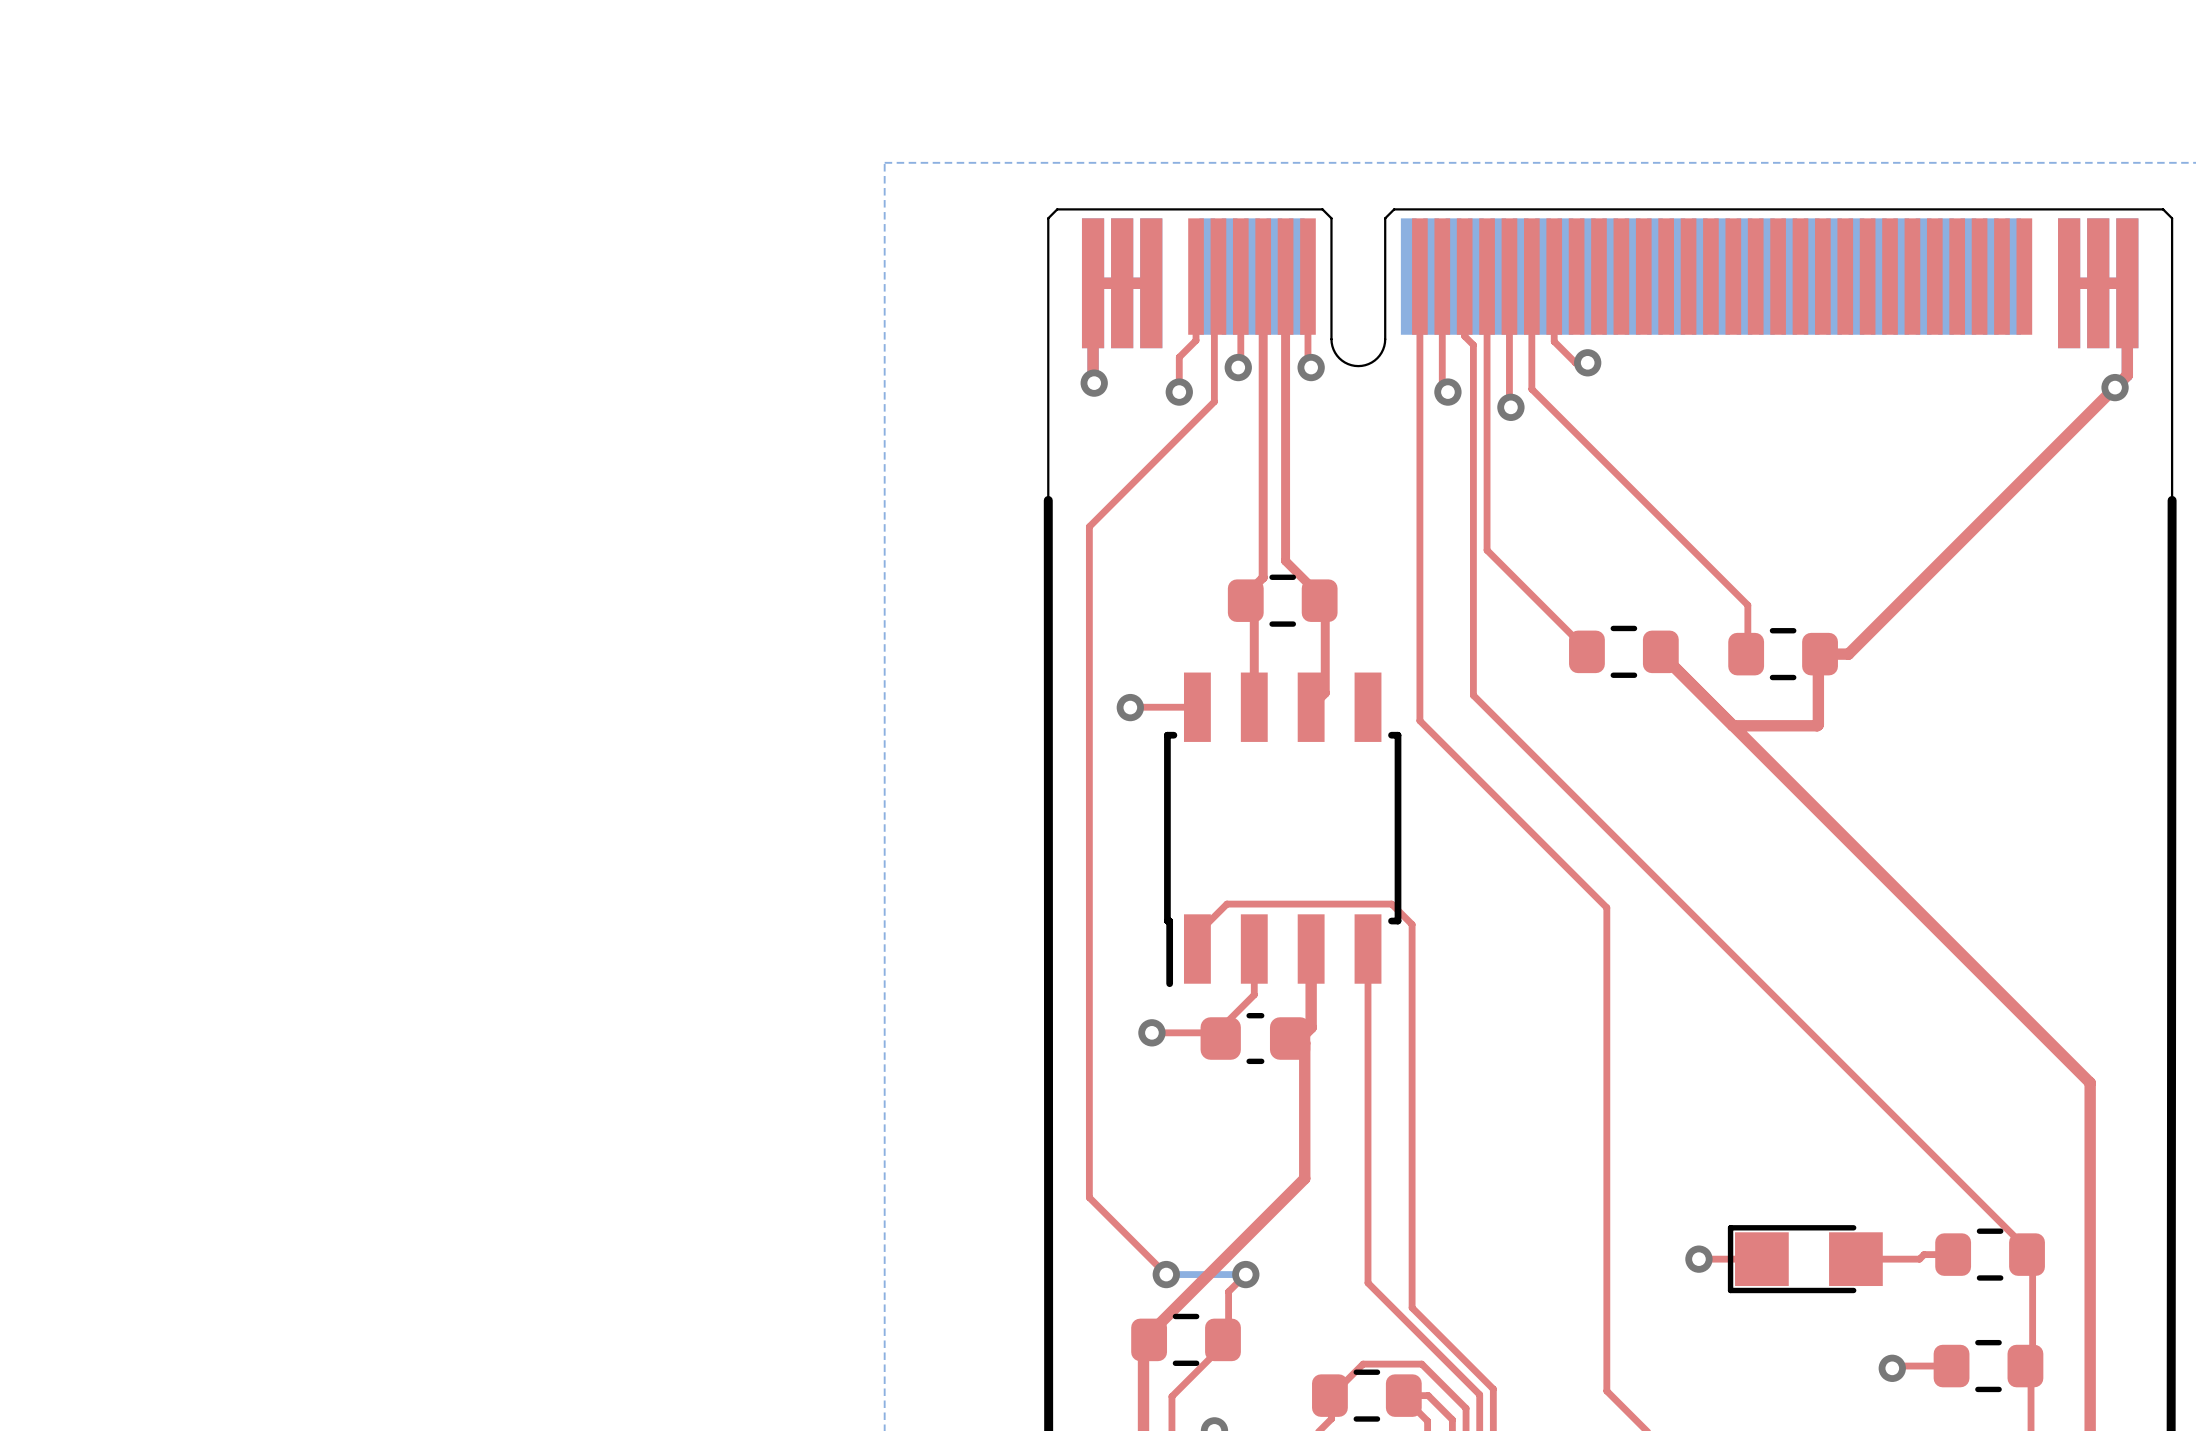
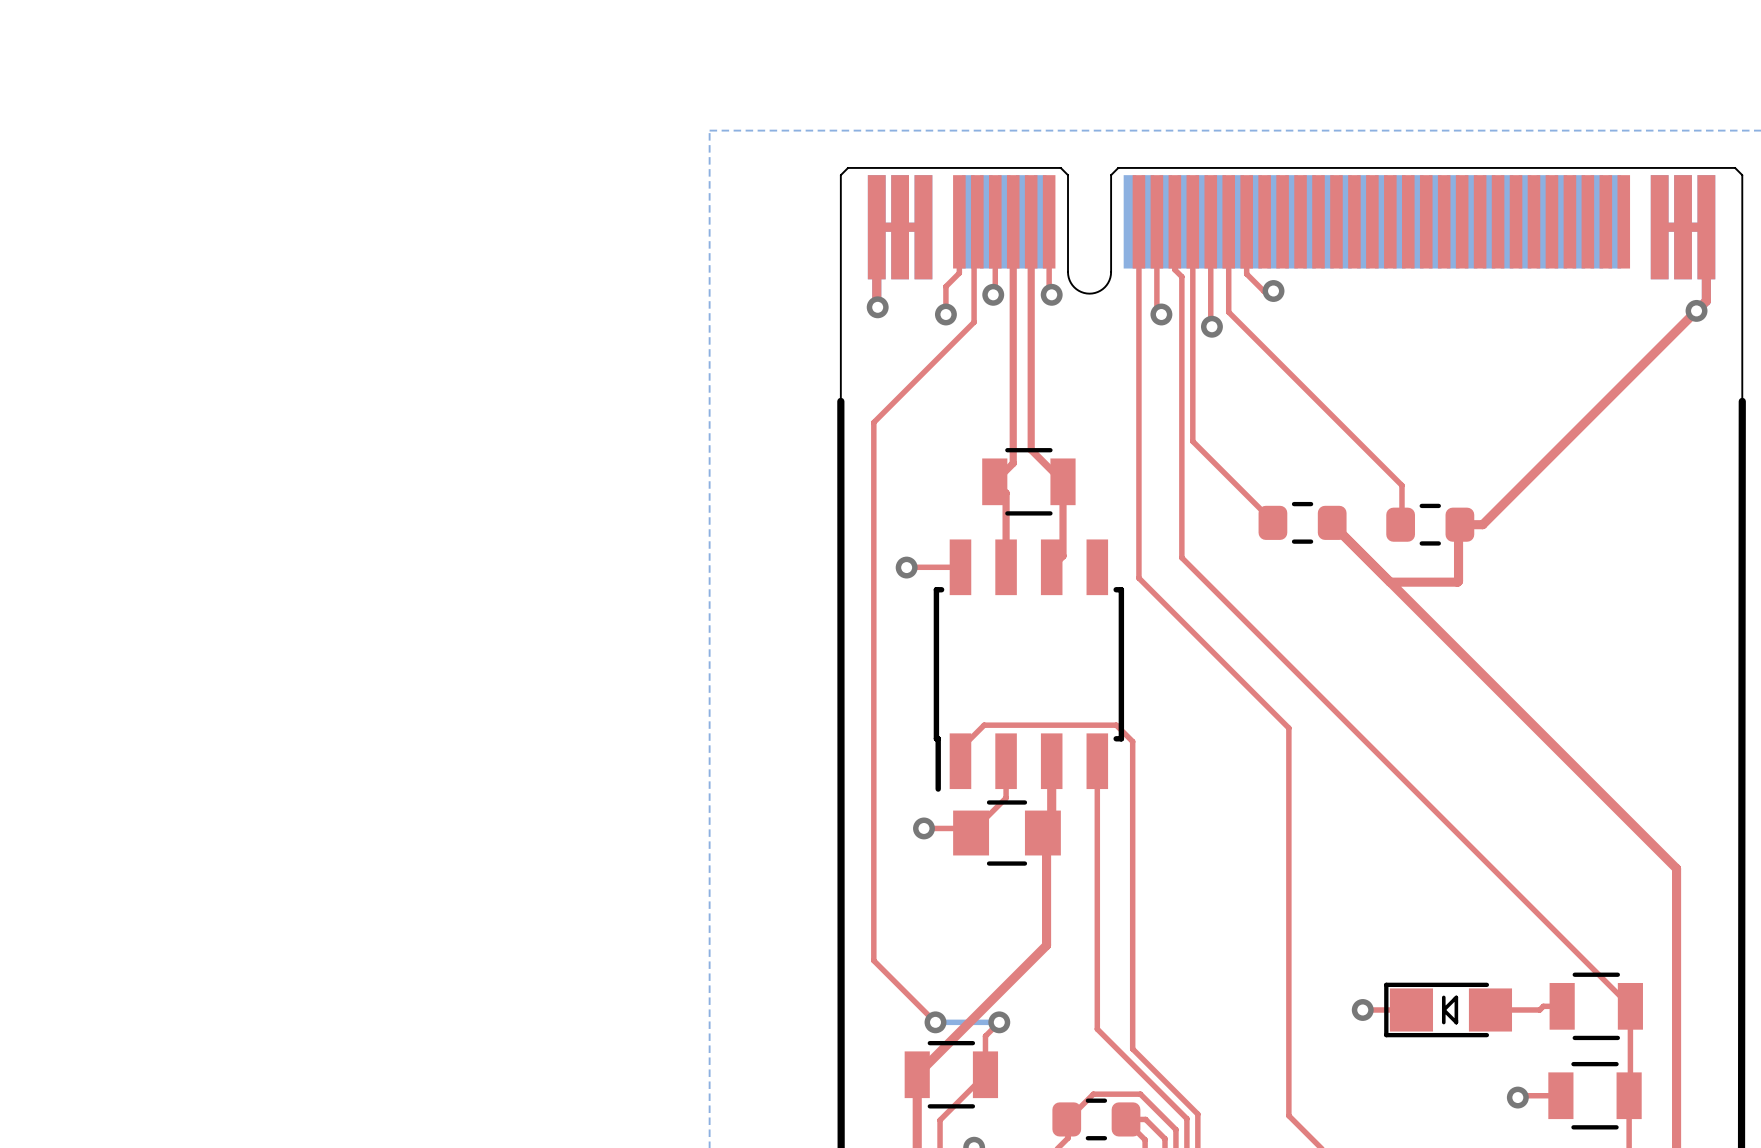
part footprint: [1227, 574, 1338, 627] -> [982, 448, 1076, 516]
part footprint: [1200, 1013, 1311, 1065] -> [953, 800, 1061, 866]
part footprint: [1727, 1225, 1883, 1294] -> [1384, 982, 1513, 1038]
part footprint: [1935, 1228, 2045, 1281] -> [1549, 972, 1643, 1041]
part footprint: [1131, 1313, 1241, 1366] -> [904, 1040, 999, 1109]
part footprint: [1933, 1339, 2044, 1393] -> [1548, 1061, 1642, 1130]

